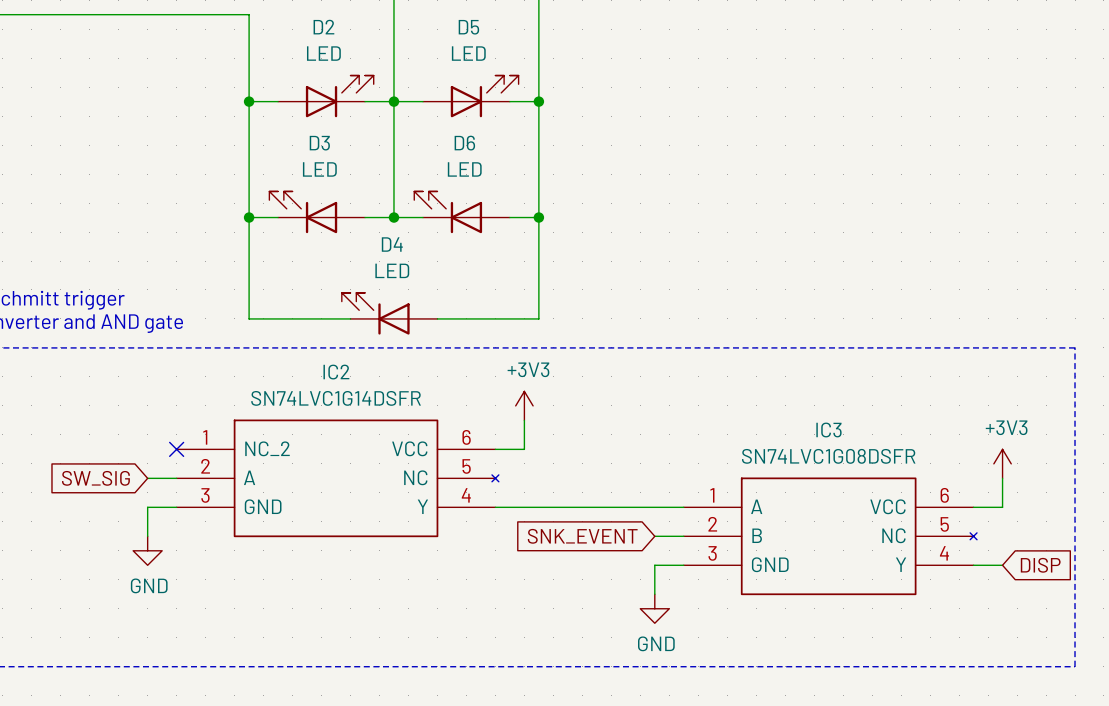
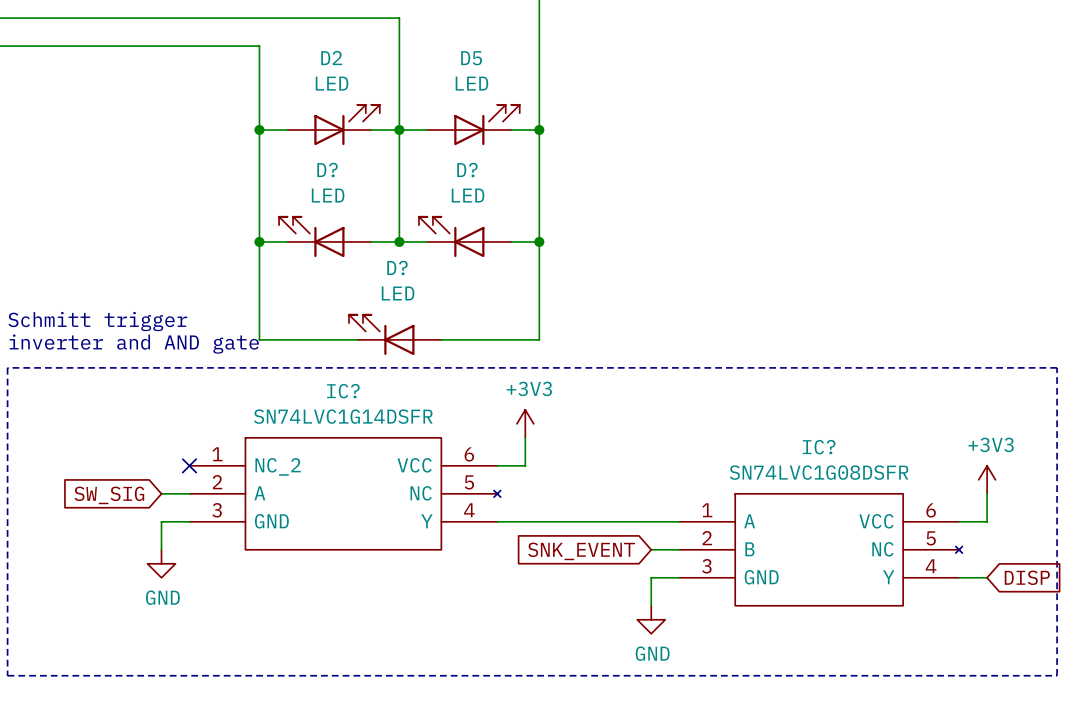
D3 name: D3 (319, 143) -> D? (327, 170)
D6 name: D6 (464, 143) -> D? (467, 170)
D4 name: D4 (392, 244) -> D? (397, 267)
IC2 name: IC2 (336, 372) -> IC? (343, 391)
IC3 name: IC3 (828, 430) -> IC? (819, 447)

